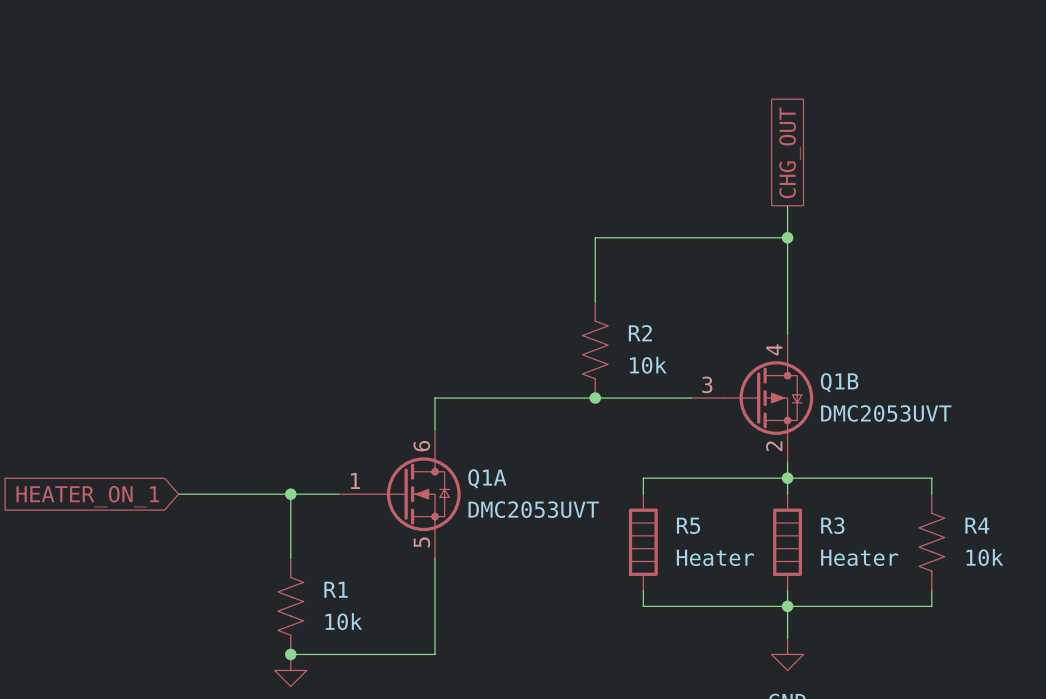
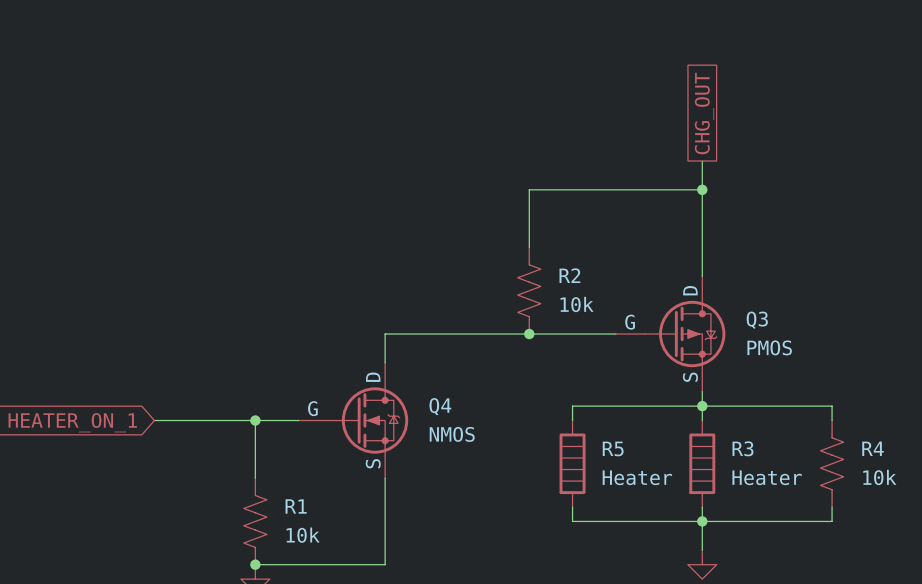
Q1B: DMC2053UVT (752, 398) -> none
Q3: none -> PMOS (670, 334)
Q1A: DMC2053UVT (399, 494) -> none
Q4: none -> NMOS (353, 420)

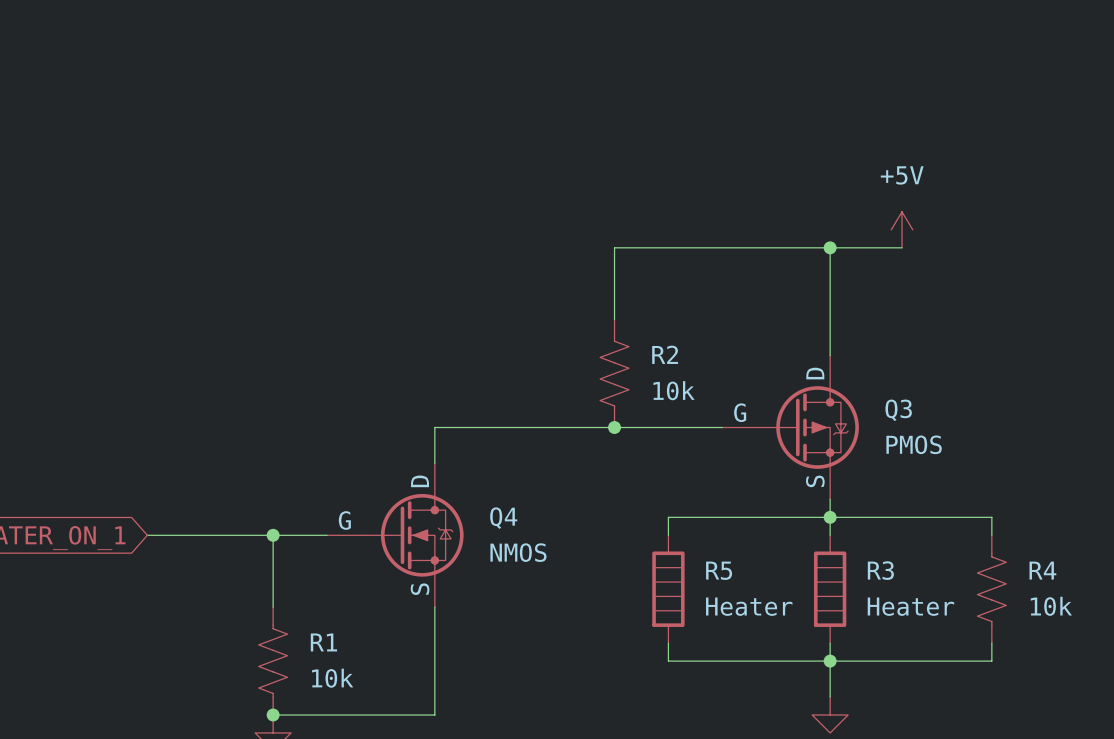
global label: CHG_OUT (704, 113) -> none
wire: (702, 161) (702, 189) -> (902, 247) (830, 247)
power symbol: none -> +5V (902, 229)

